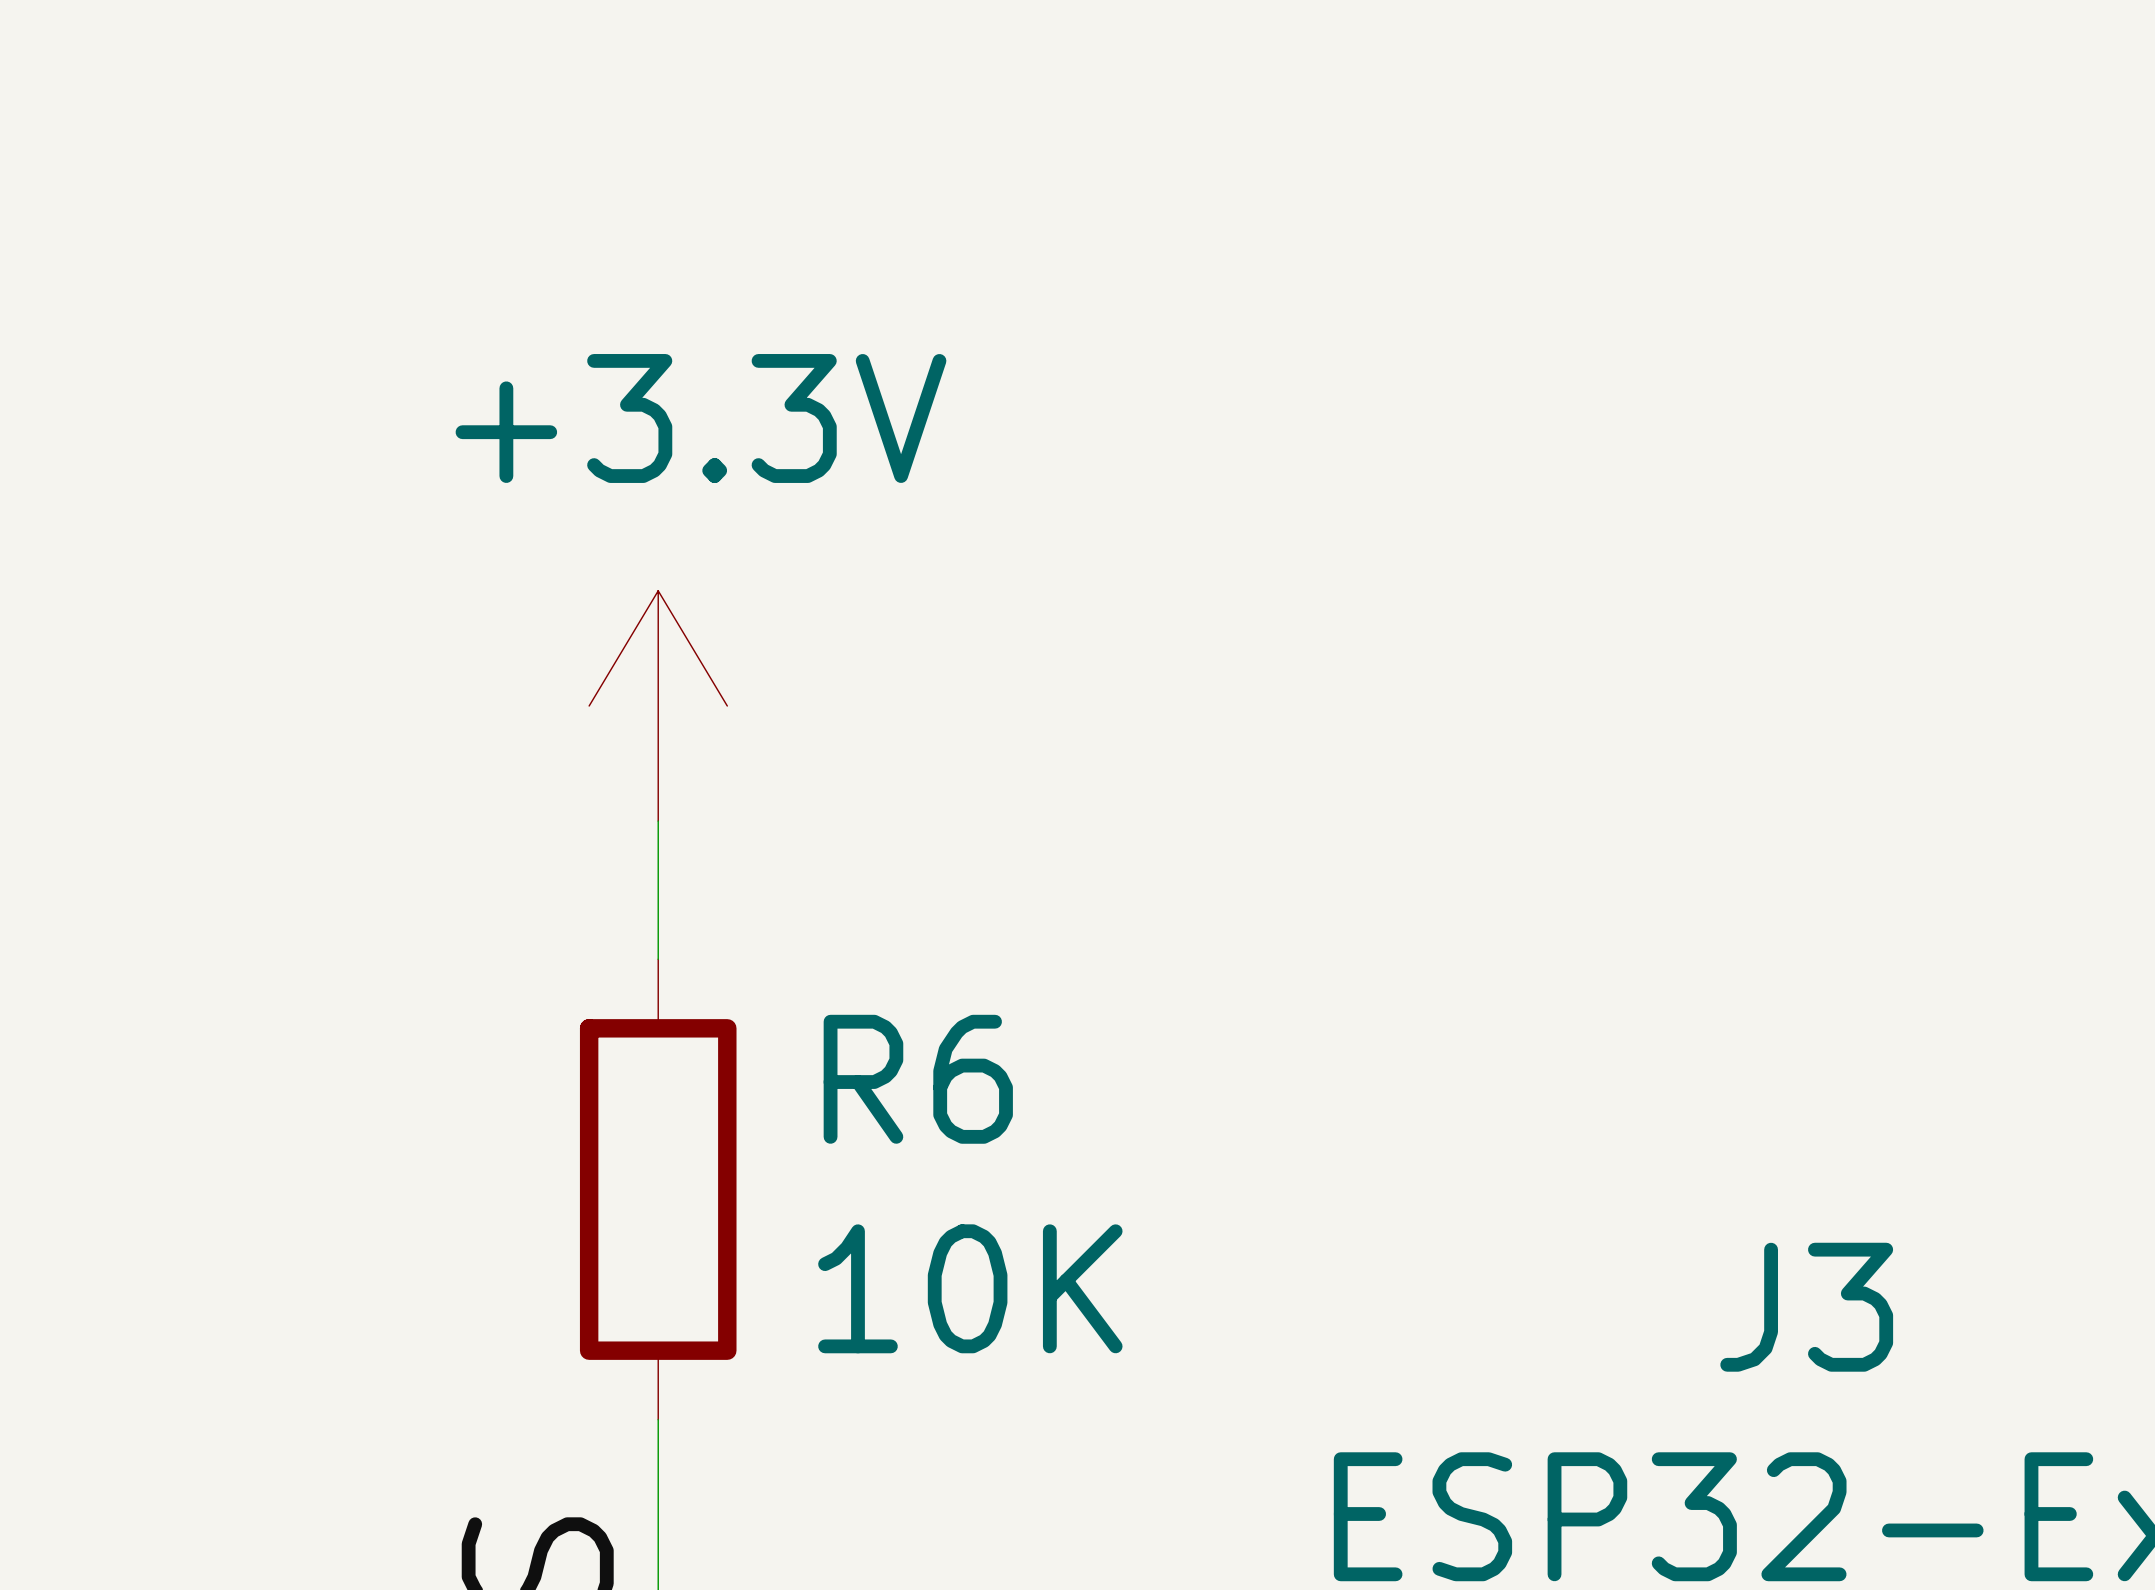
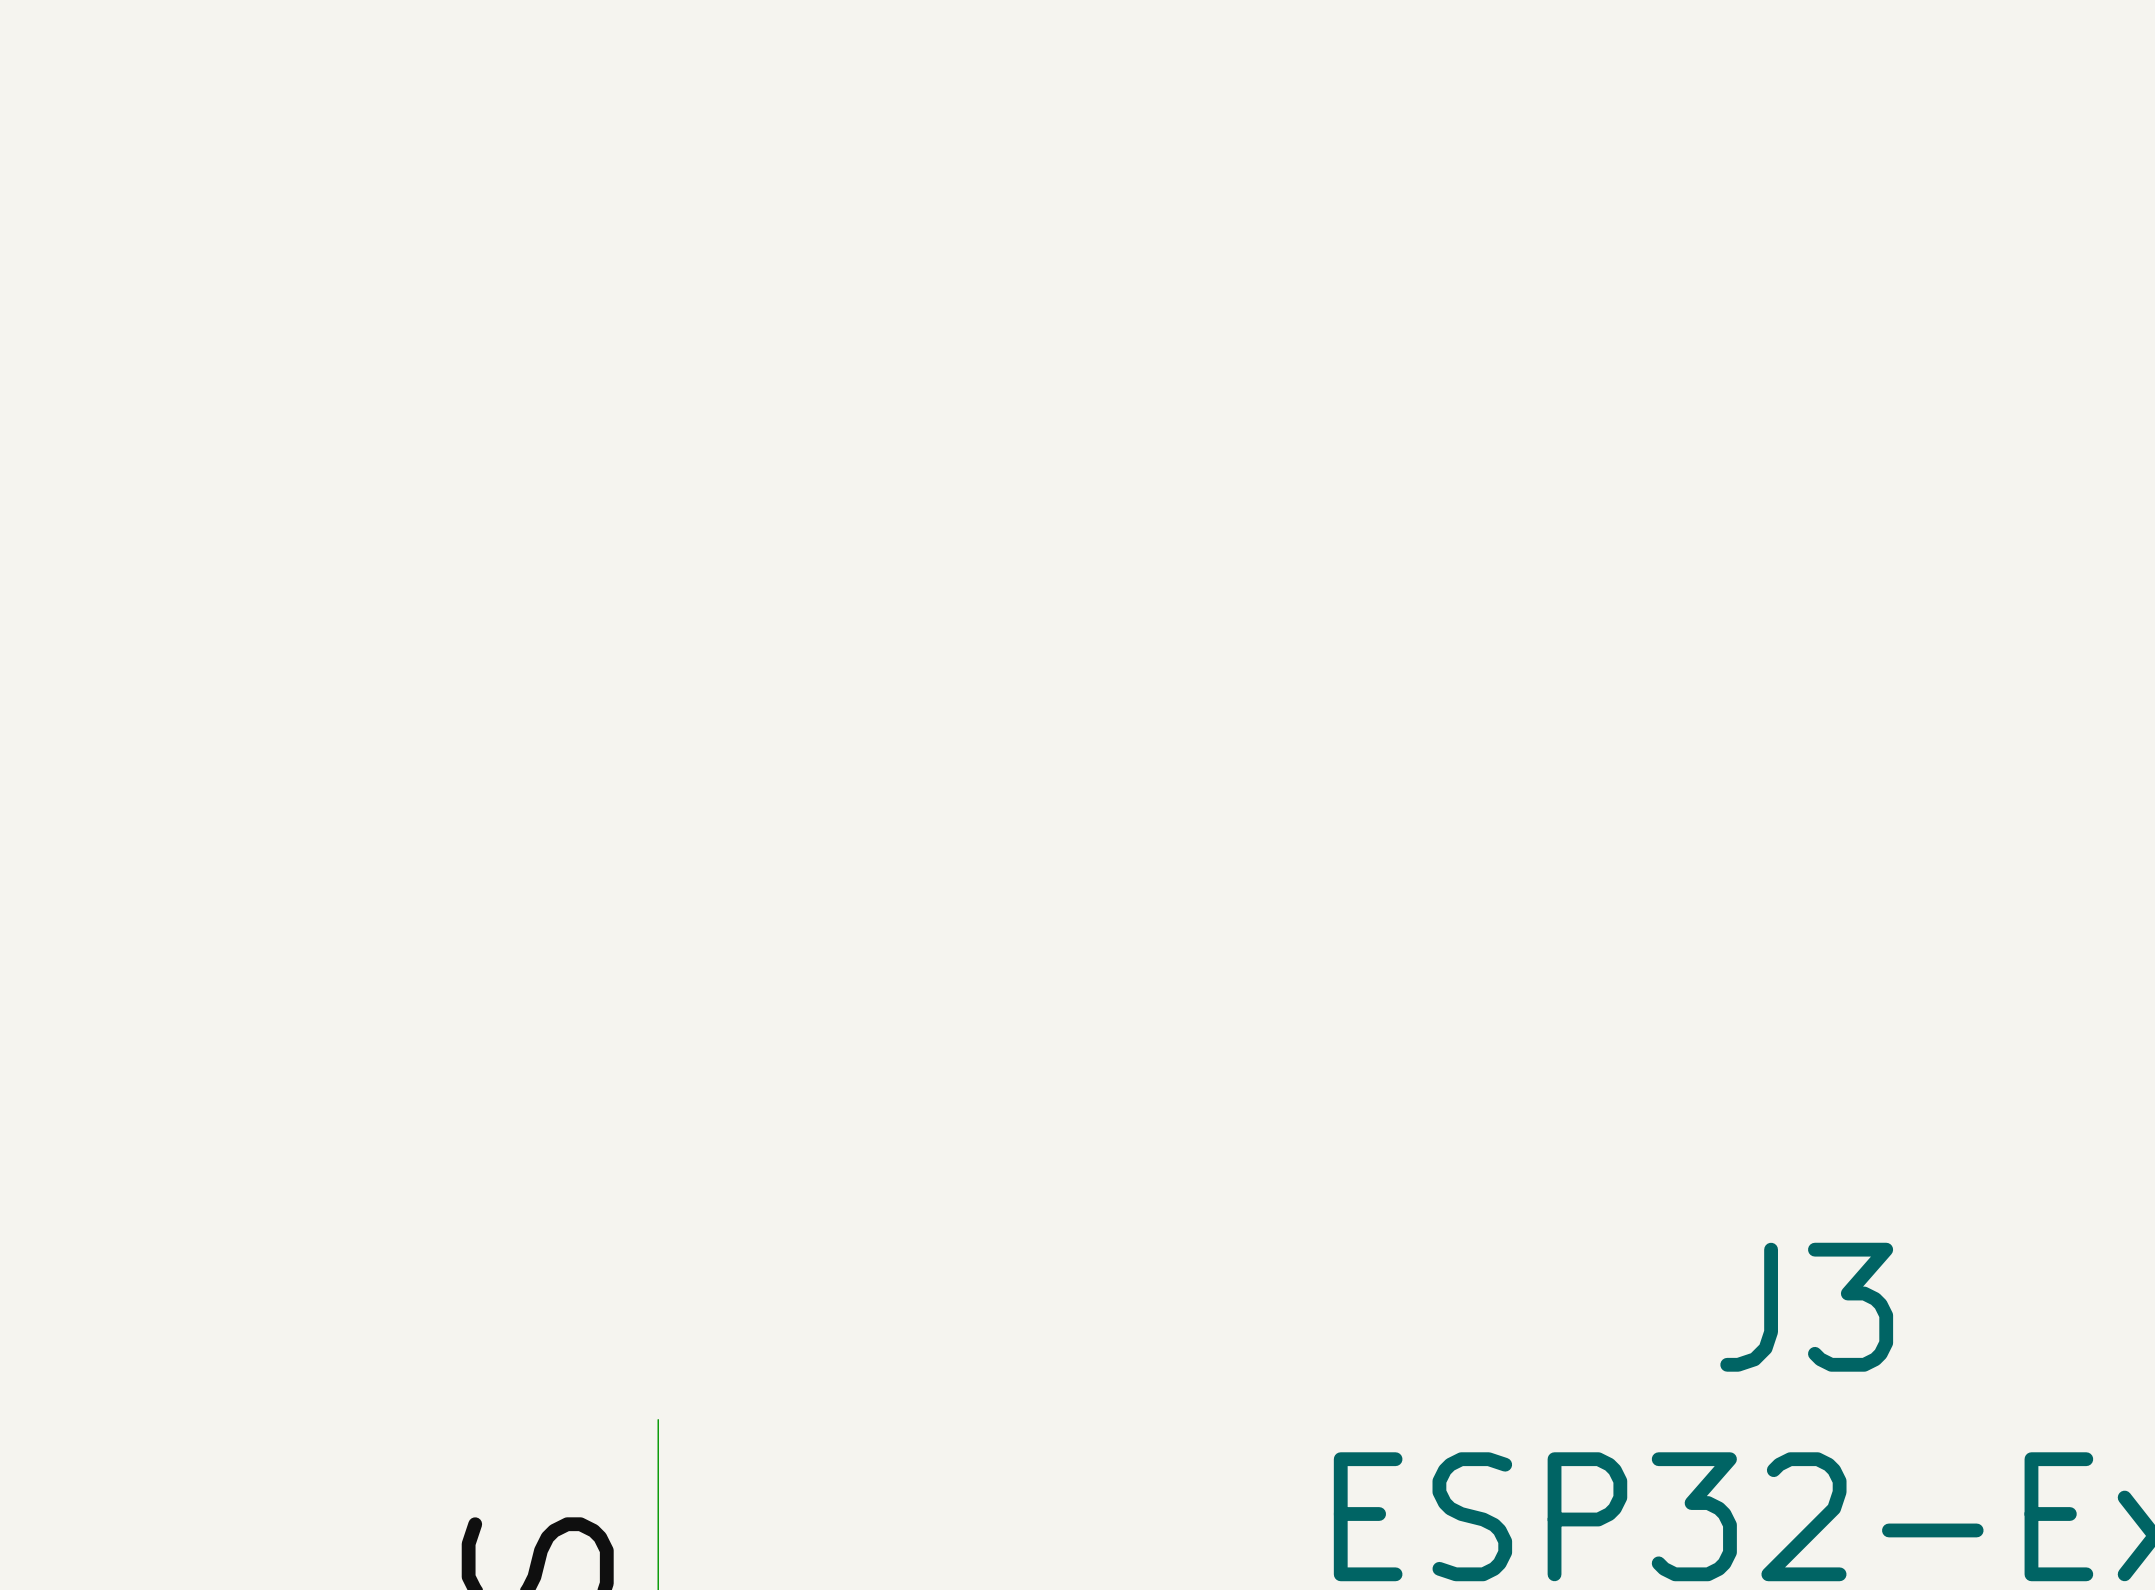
power symbol: +3.3V (658, 705) -> none
wire: (658, 821) (658, 959) -> none
R6: 10K (658, 1189) -> none

